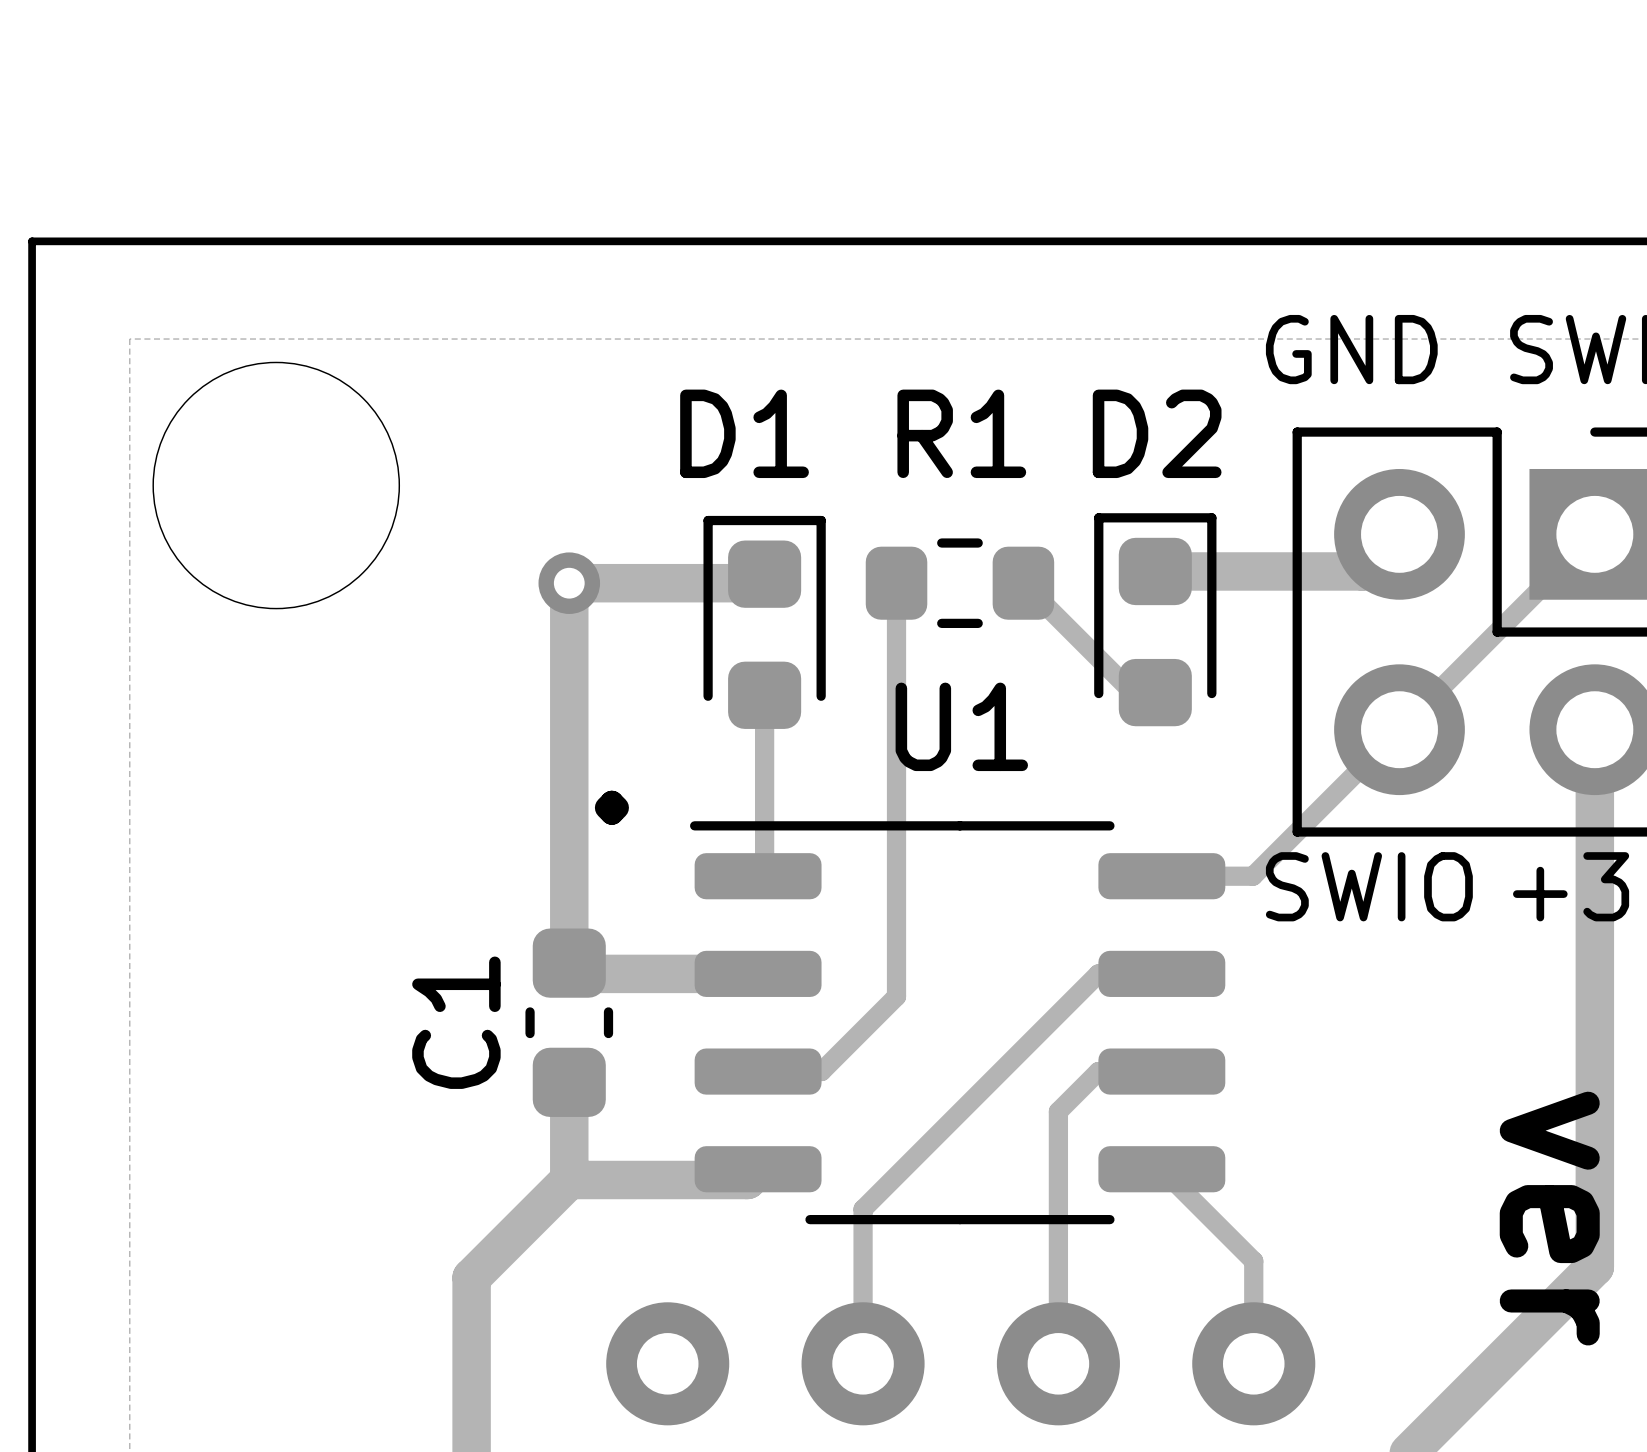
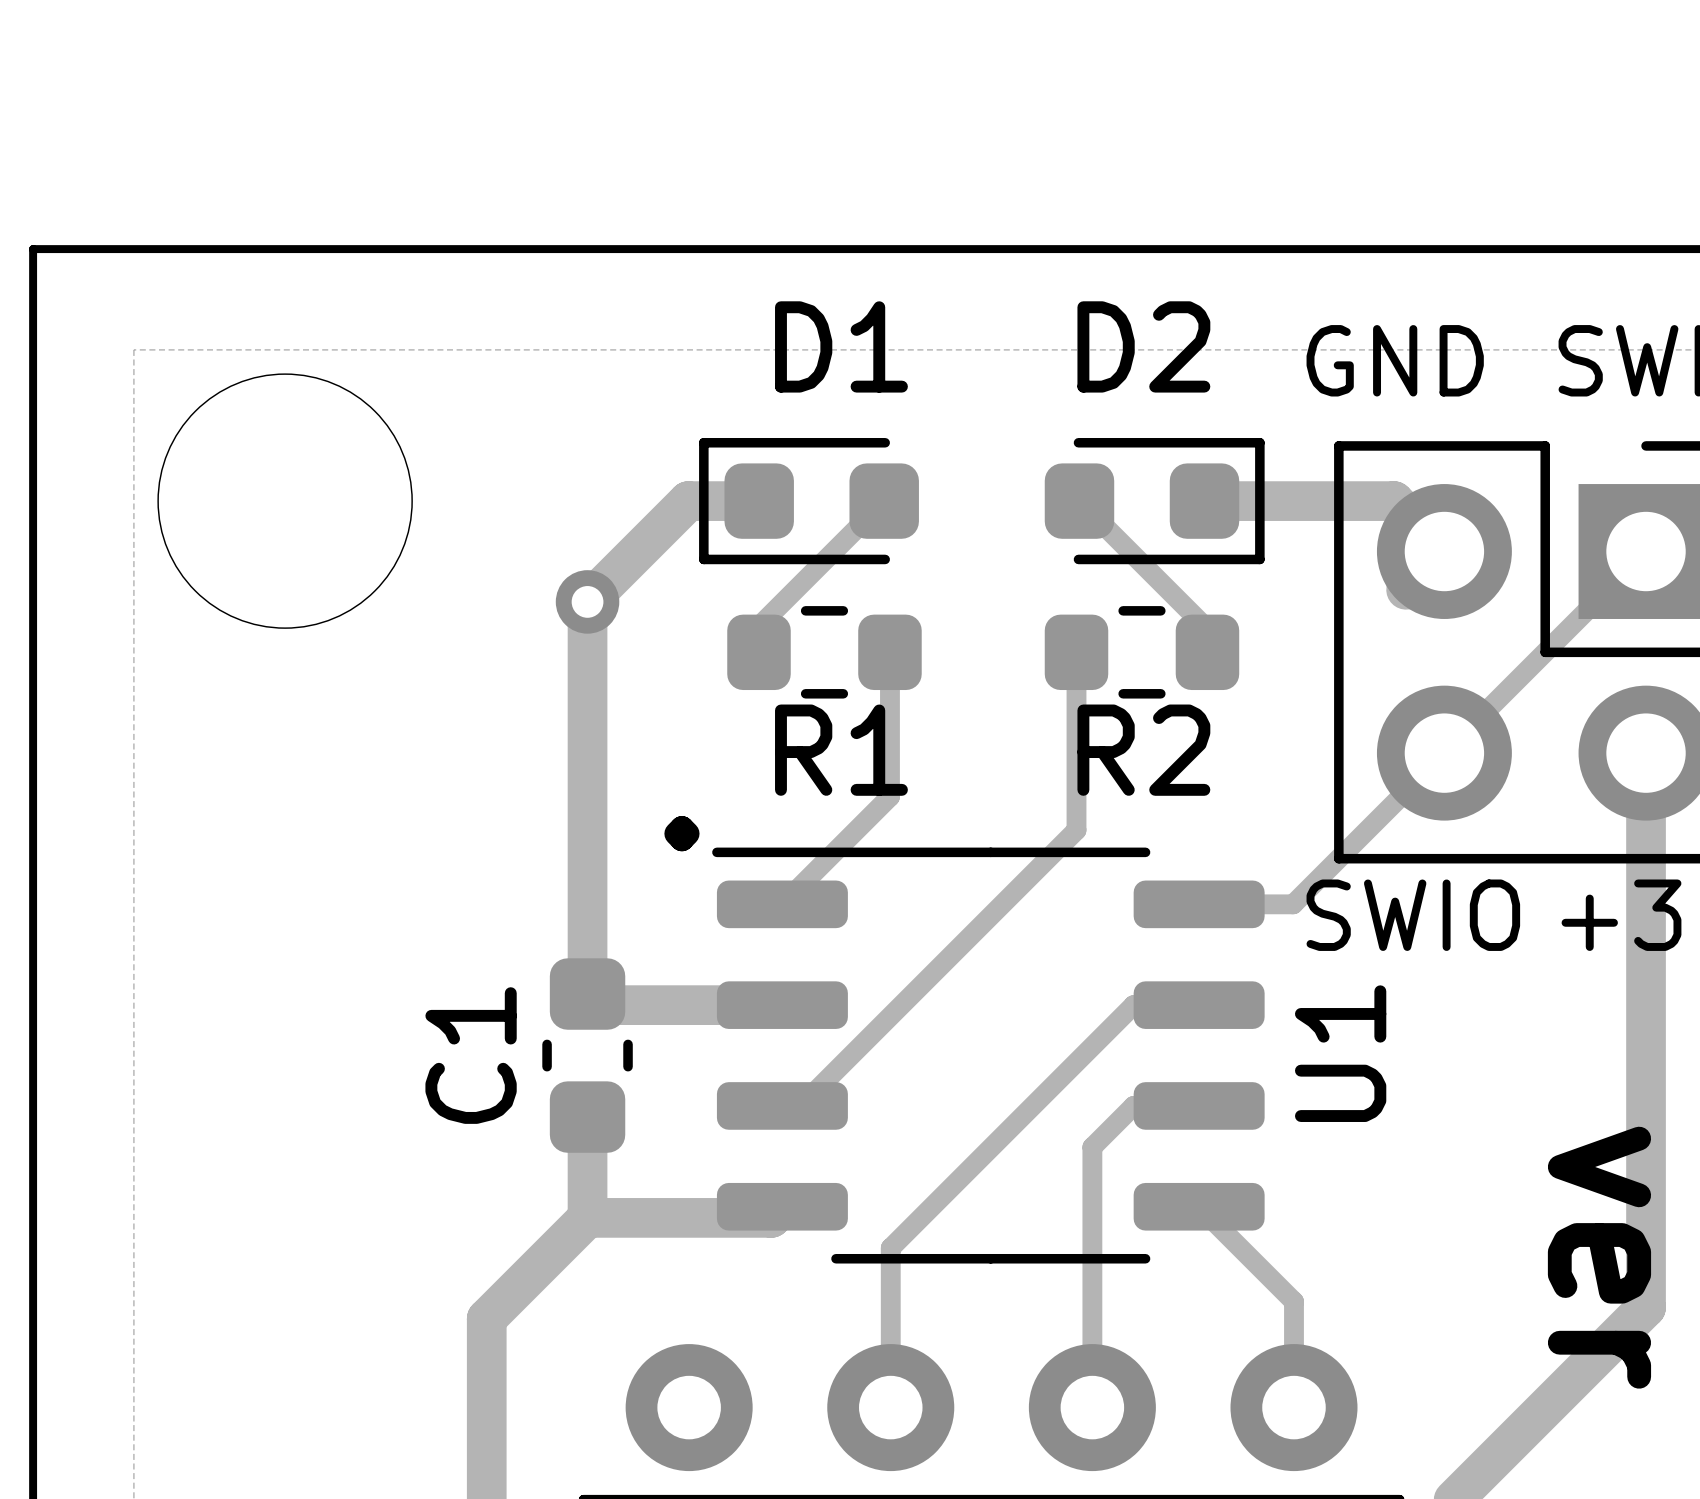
R1 name position: R1 (961, 433) -> R1 (841, 750)
track: none -> (884, 501) (759, 626) (759, 652)
track: none -> (1079, 501) (1207, 629) (1207, 652)
track: none -> (1204, 501) (1394, 501) (1444, 551)
track: (1155, 571) (1362, 571) -> none
track: (764, 574) (755, 583) (569, 583) -> (759, 501) (688, 501) (587, 601)
track: (896, 583) (896, 996) (821, 1071) (775, 1071) -> (1076, 652) (1076, 830) (800, 1105)
R1 position: (959, 583) -> (824, 652)
track: (1023, 583) (1132, 692) (1155, 692) -> none
D2 rotation: 0° (1155, 619) -> 90° clockwise (1154, 501)
D2 position: (1155, 619) -> (1154, 501)
D1 rotation: 0° (764, 622) -> 90° counterclockwise (809, 501)
D1 position: (764, 622) -> (809, 501)
R2: none -> (1141, 652)
track: (764, 695) (764, 869) -> (889, 652) (889, 796) (789, 897)
U1 name rotation: 0° (961, 726) -> 90° counterclockwise (1340, 1053)
U1 name position: U1 (961, 726) -> U1 (1340, 1053)
text position: . (611, 807) -> . (681, 833)

